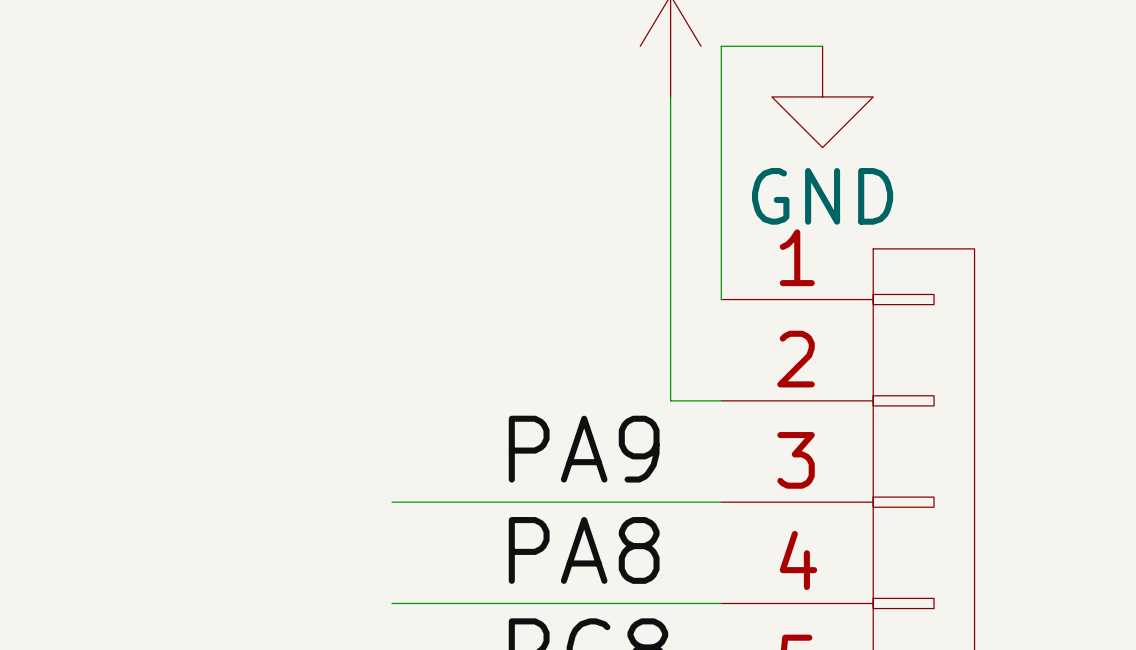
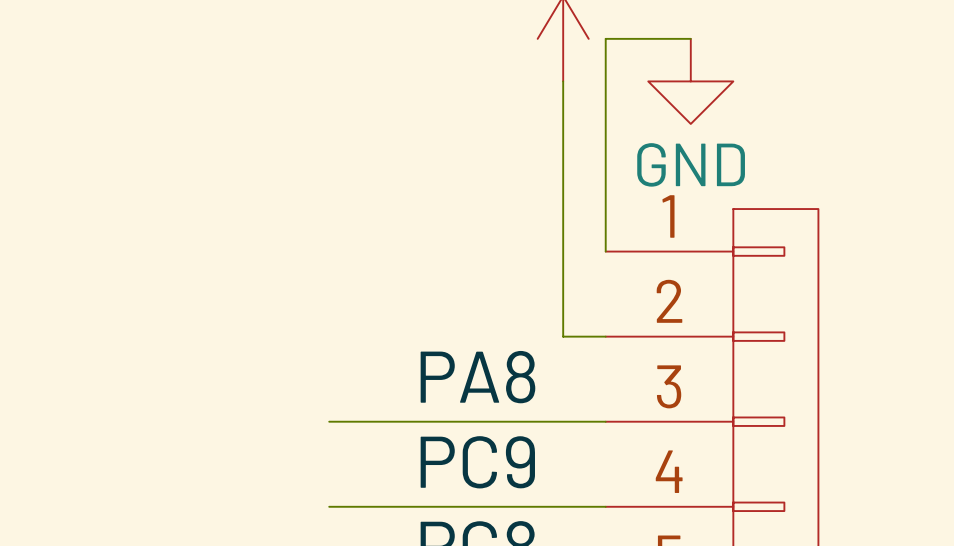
label: PA9 (584, 449) -> PA8 (477, 377)
label: PA8 (584, 550) -> PC9 (477, 462)

